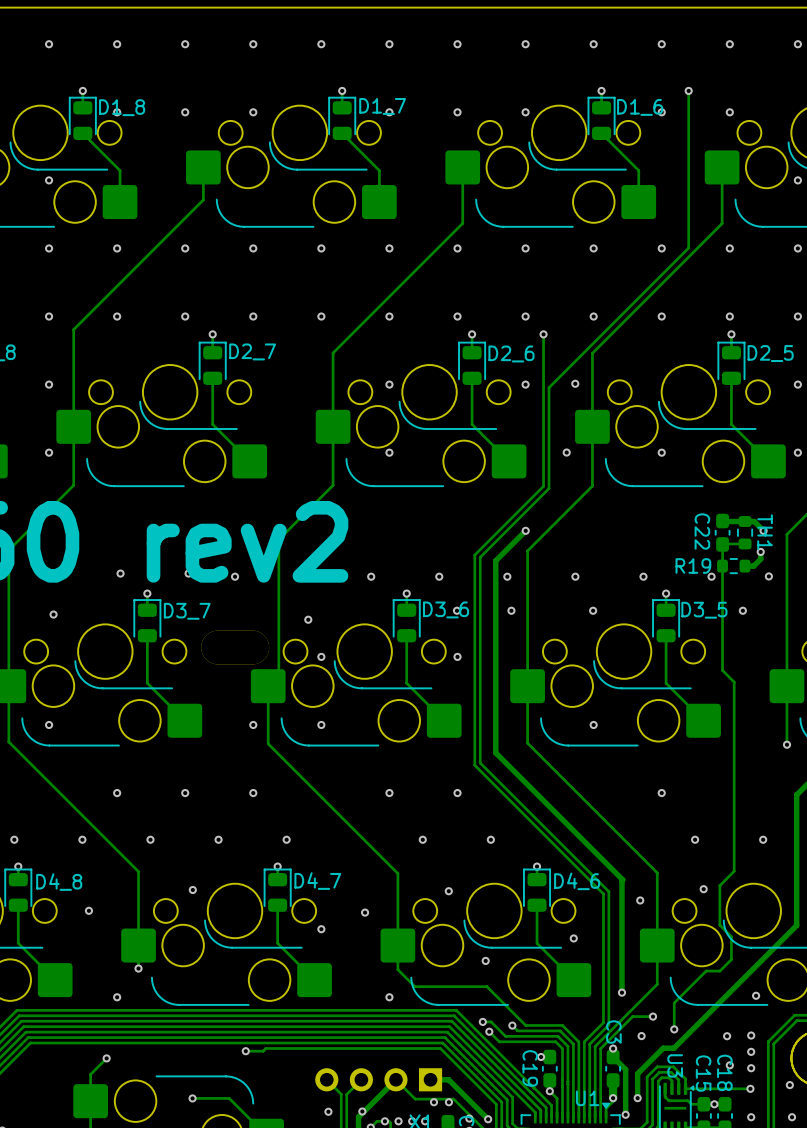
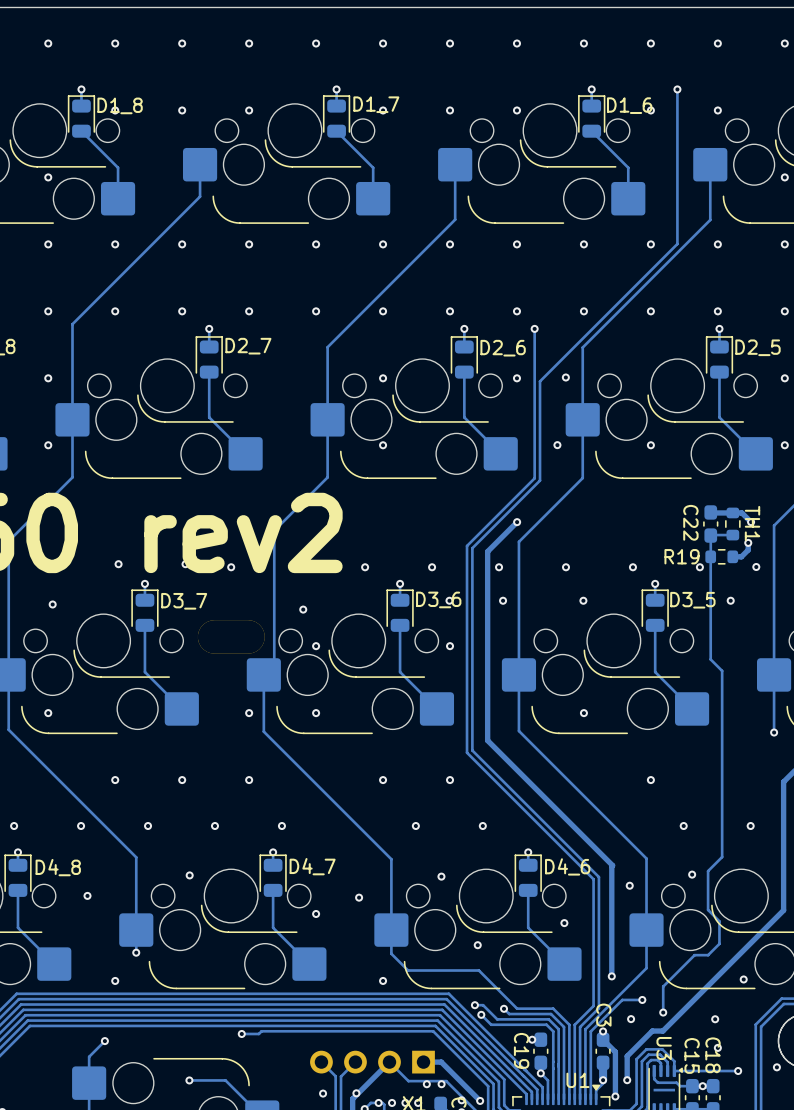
via: (751, 1035) -> none
via: (751, 1051) -> none
via: (751, 1068) -> none
via: (751, 1117) -> none
via: (792, 1117) -> none

